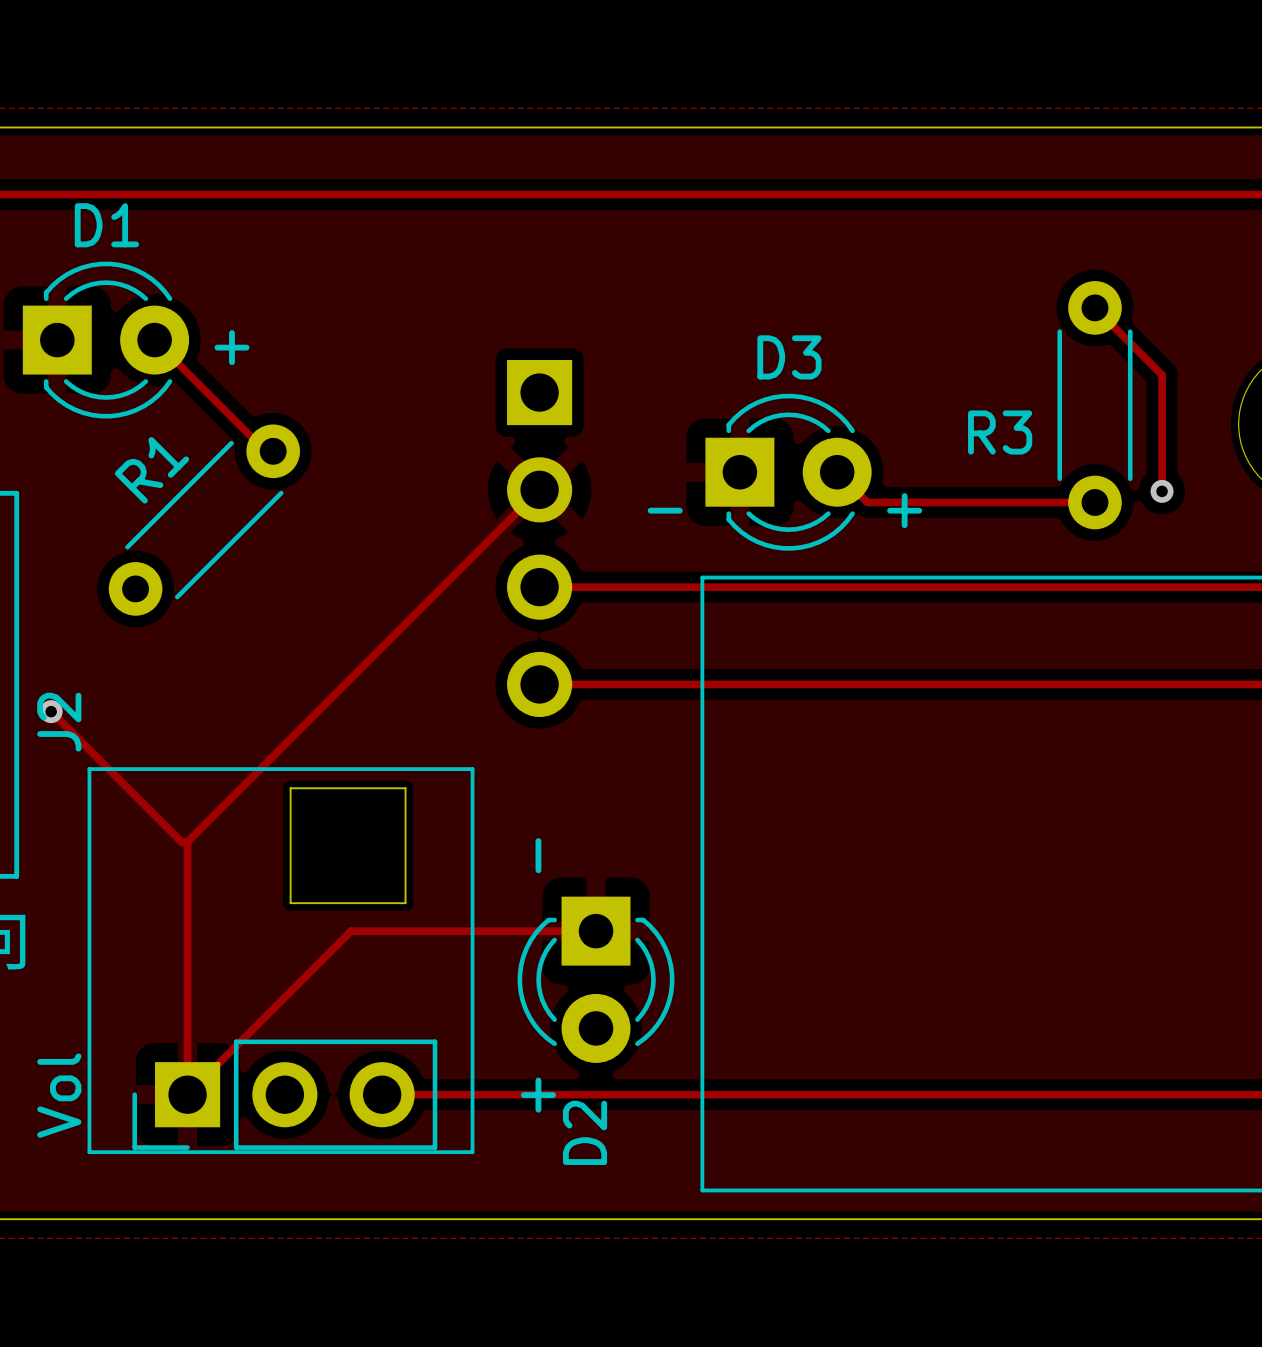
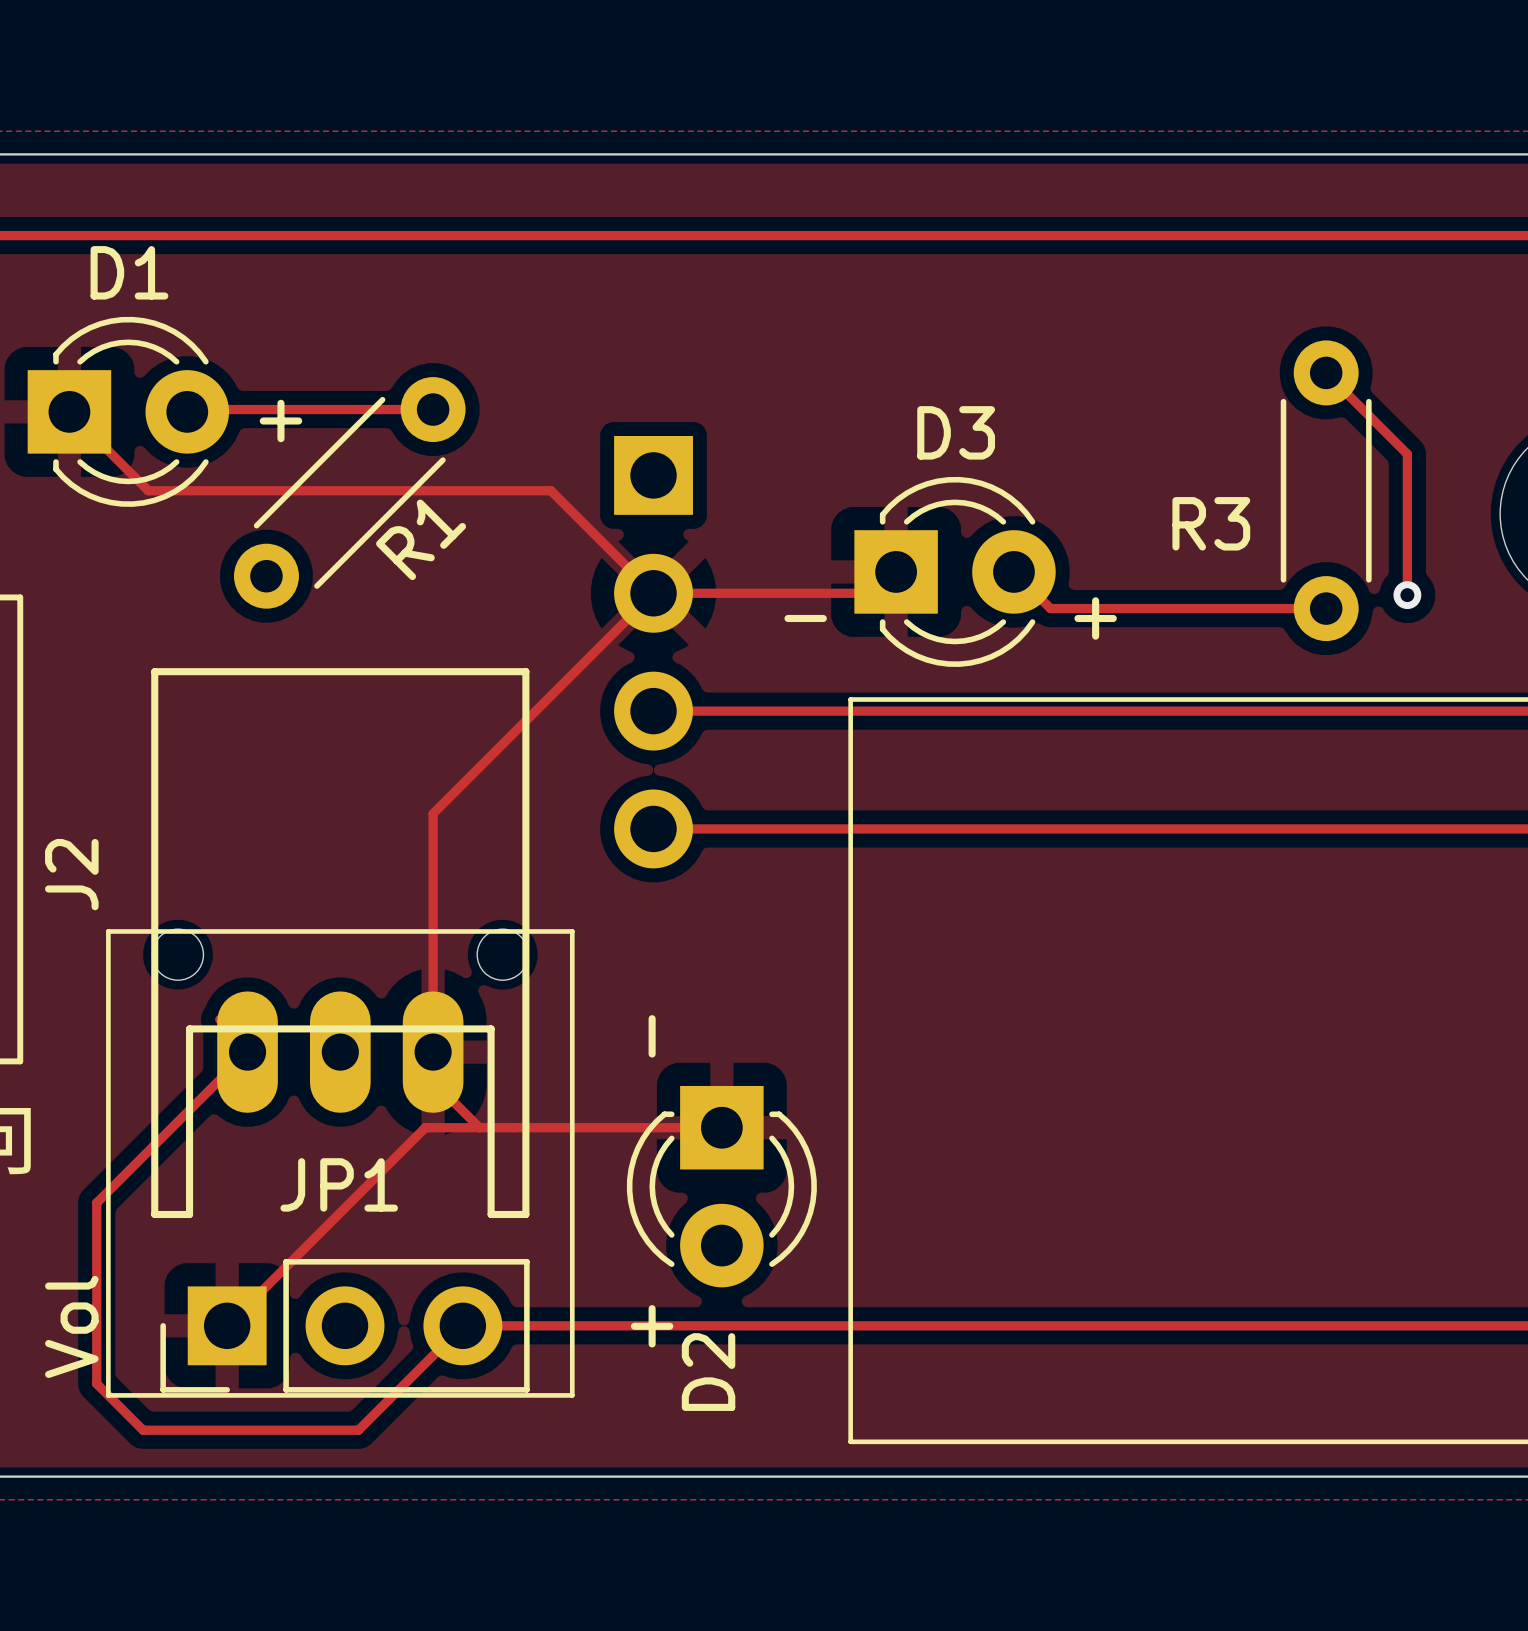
track: none -> (69, 411) (148, 490) (551, 490) (653, 593) (864, 593) (885, 571) (896, 571) (874, 593)
track: (154, 340) (265, 451) (273, 451) -> (187, 411) (189, 409) (433, 409) (430, 411)
R1 name position: R1 (152, 470) -> R1 (421, 539)
R1 position: (204, 520) -> (349, 492)
track: (357, 671) (187, 841) -> (433, 813) (433, 1081) (479, 1127)
track: (51, 711) (181, 841) -> none
via: (51, 711) -> none
JP1: none -> (340, 943)
board edge: (290, 788) (405, 788) (405, 903) (290, 903) (290, 788) -> none
track: none -> (247, 1052) (96, 1202) (96, 1383) (143, 1430) (358, 1430) (462, 1325)
track: (187, 874) (187, 1094) -> none

